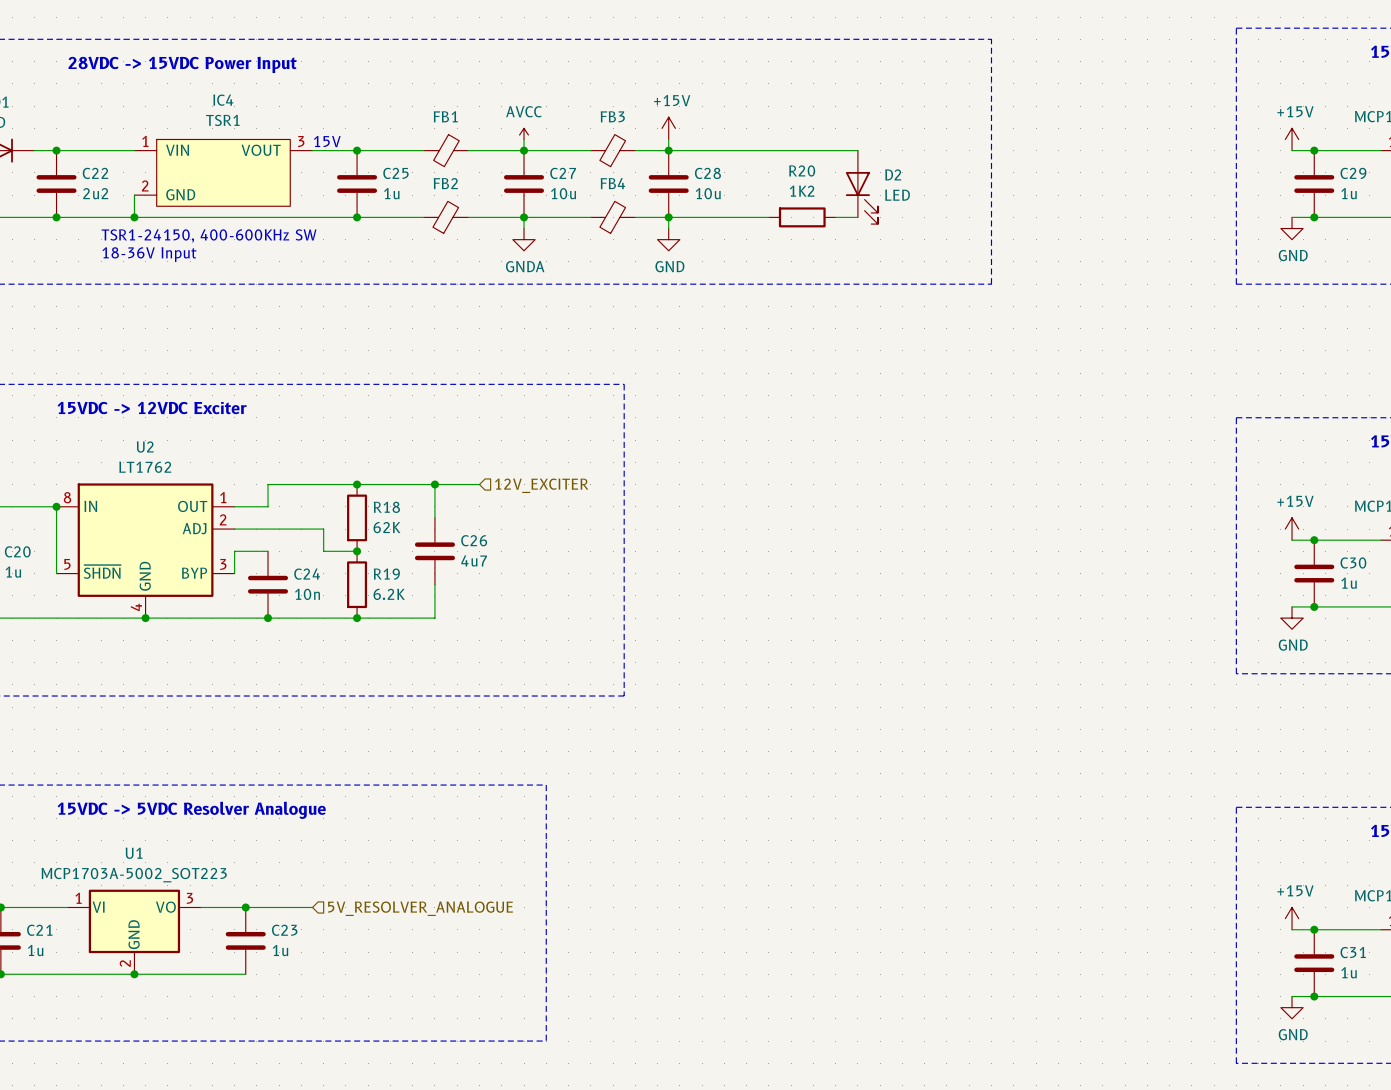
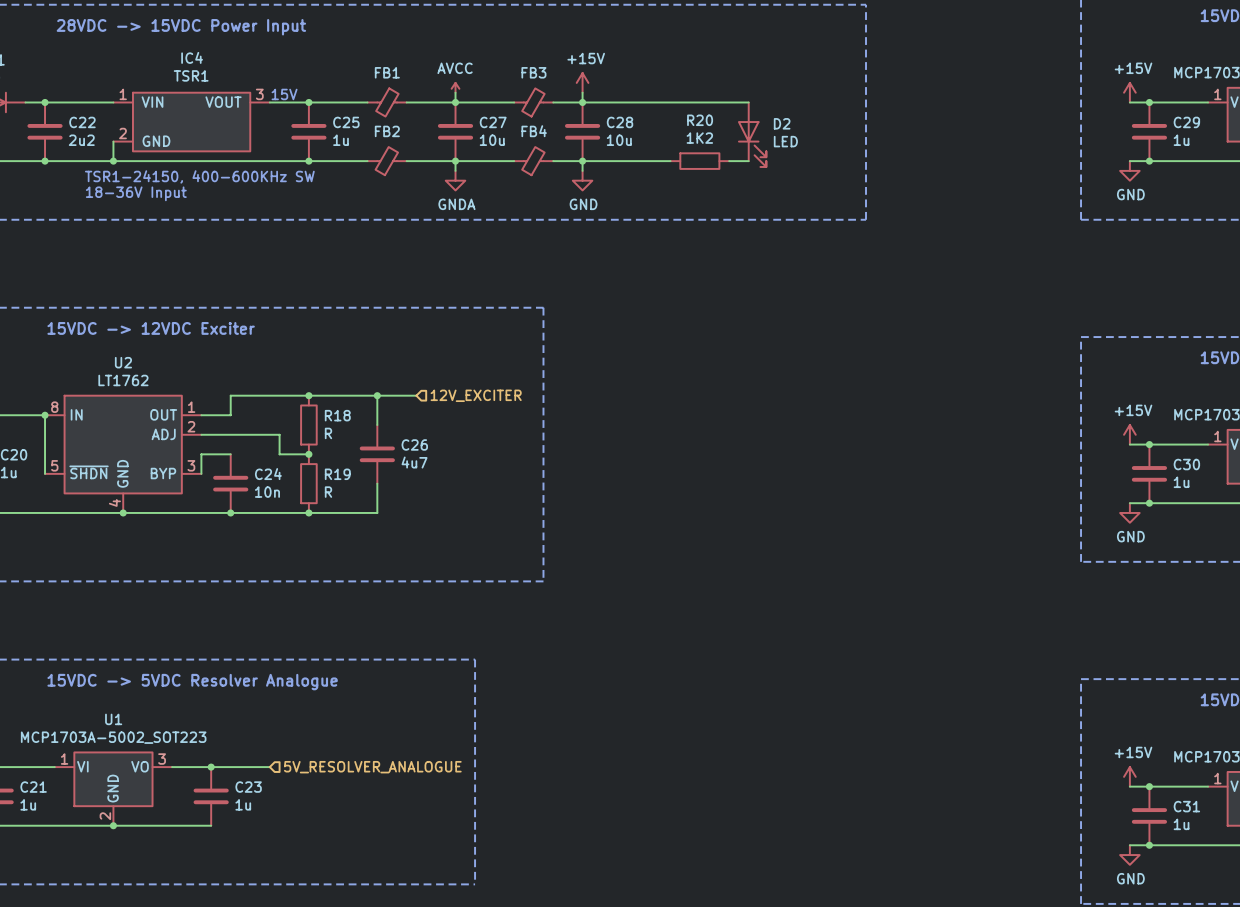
R18 value: 62K (386, 527) -> R (328, 433)
R19 value: 6.2K (389, 594) -> R (328, 492)

